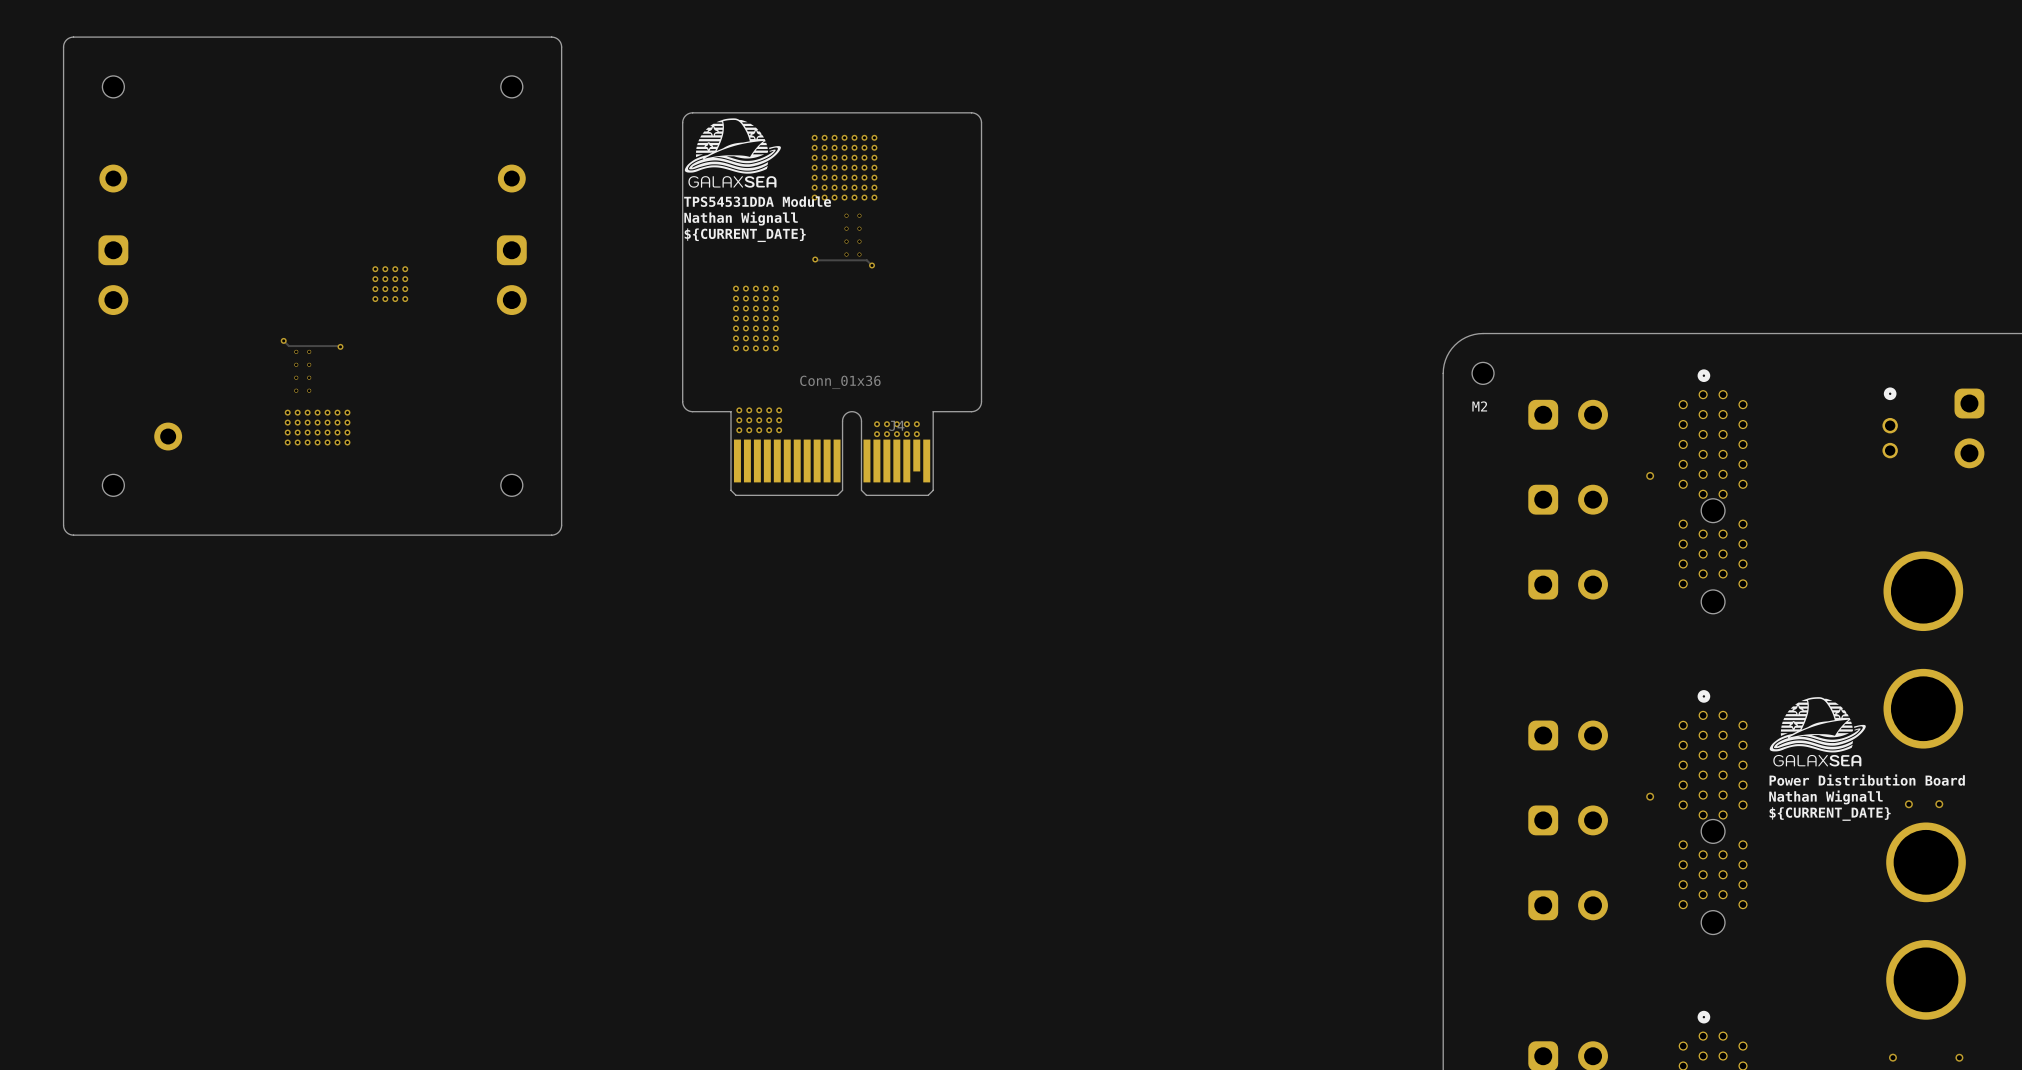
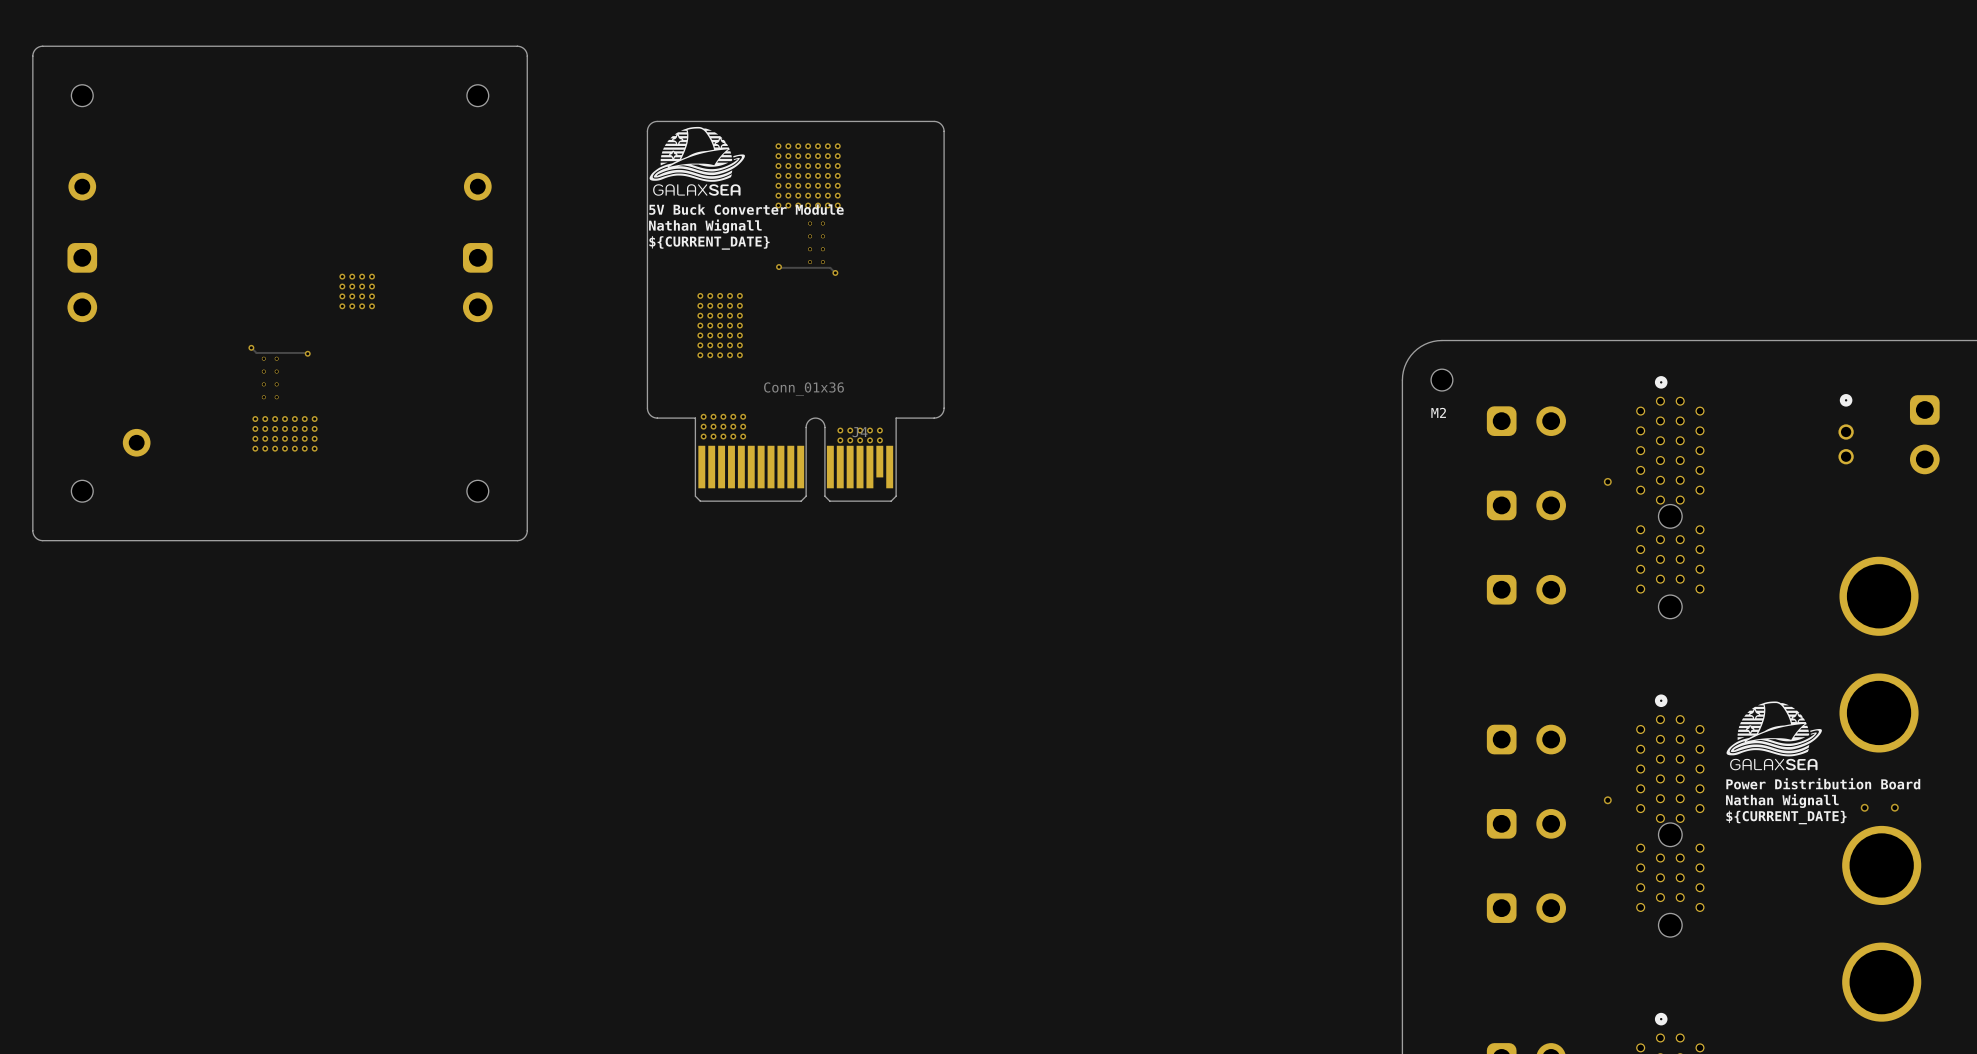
text: TPS54531DDA Module (757, 201) -> 5V Buck Converter Module (746, 209)

